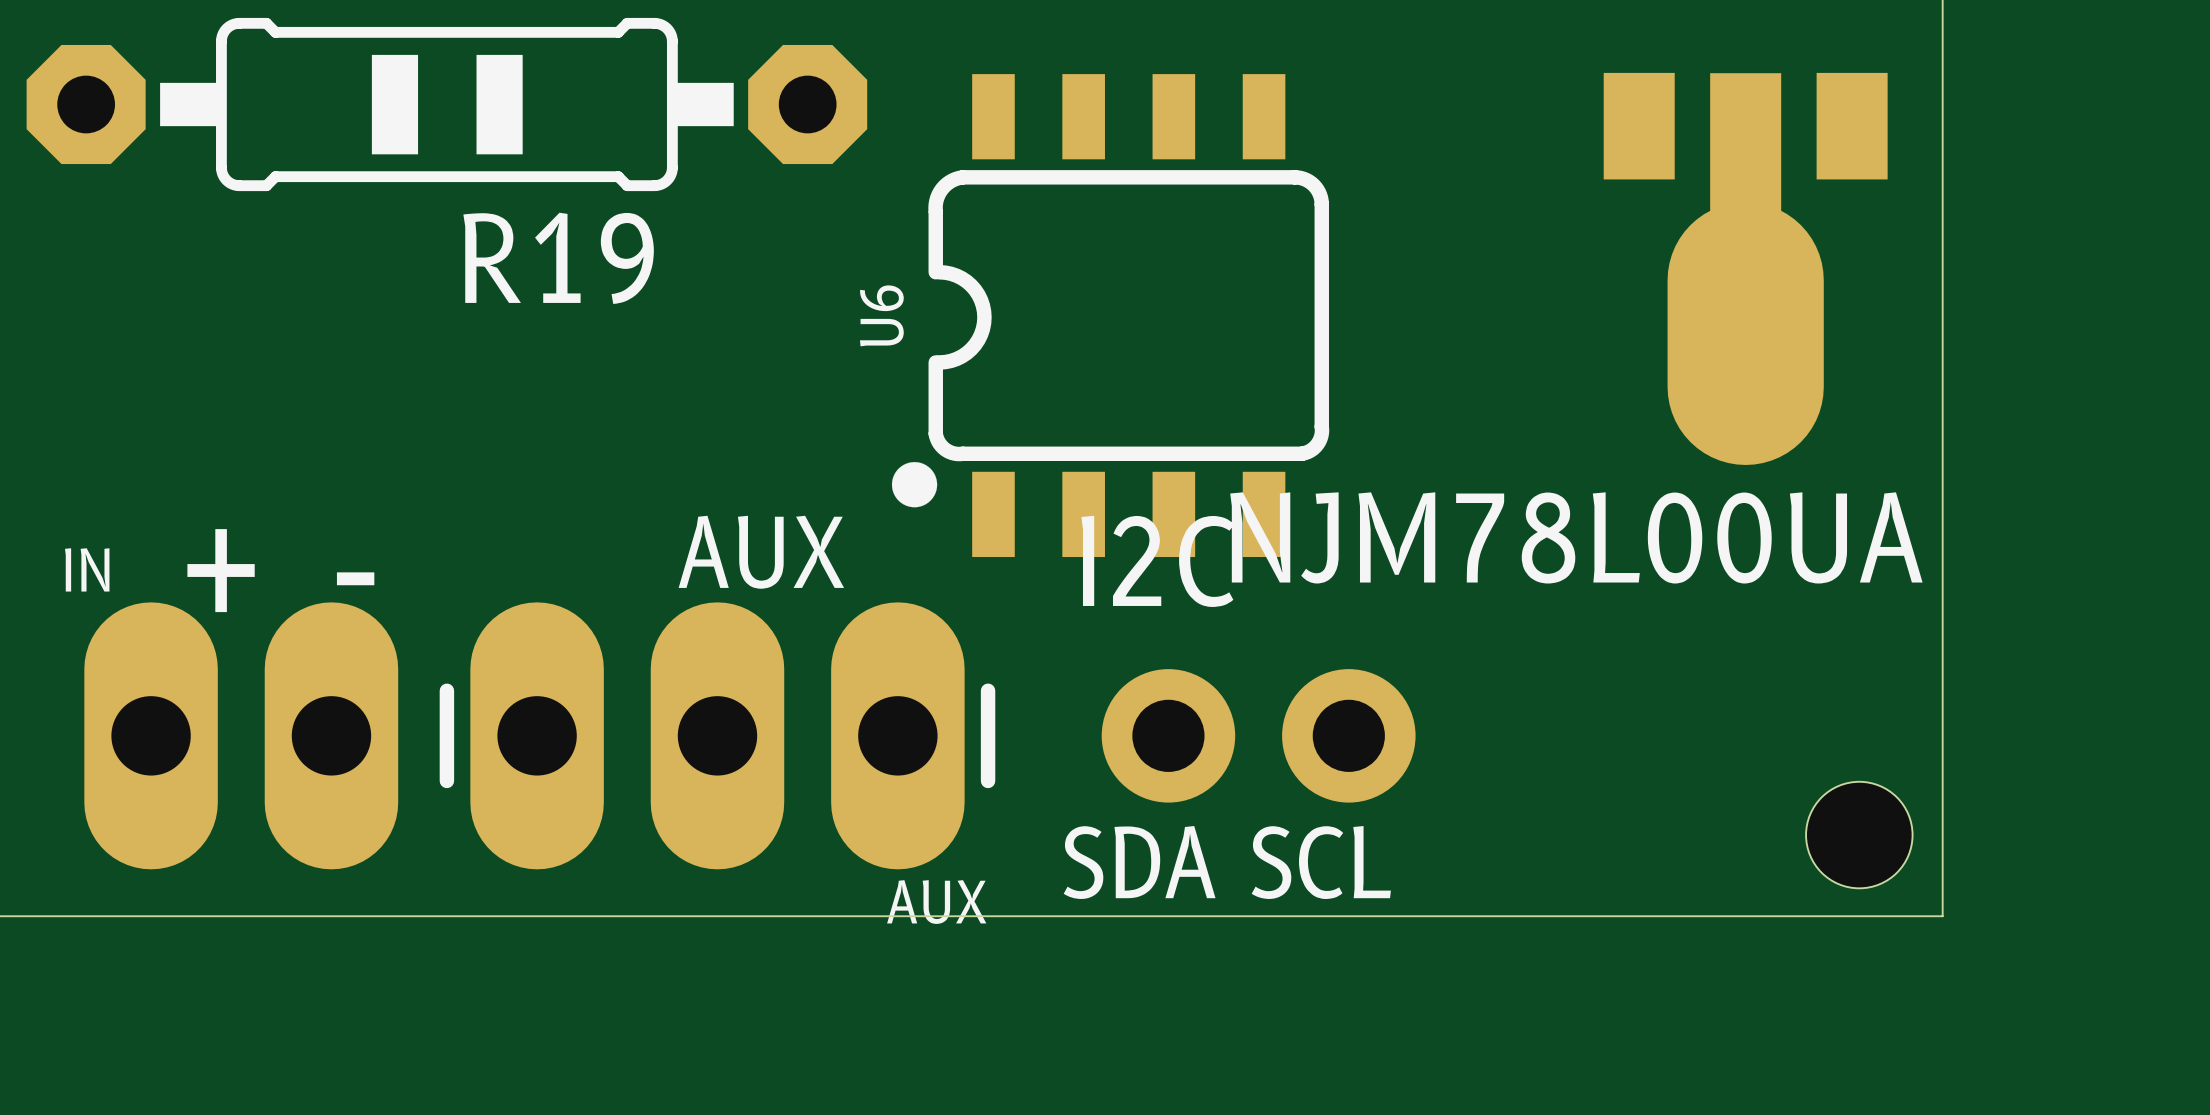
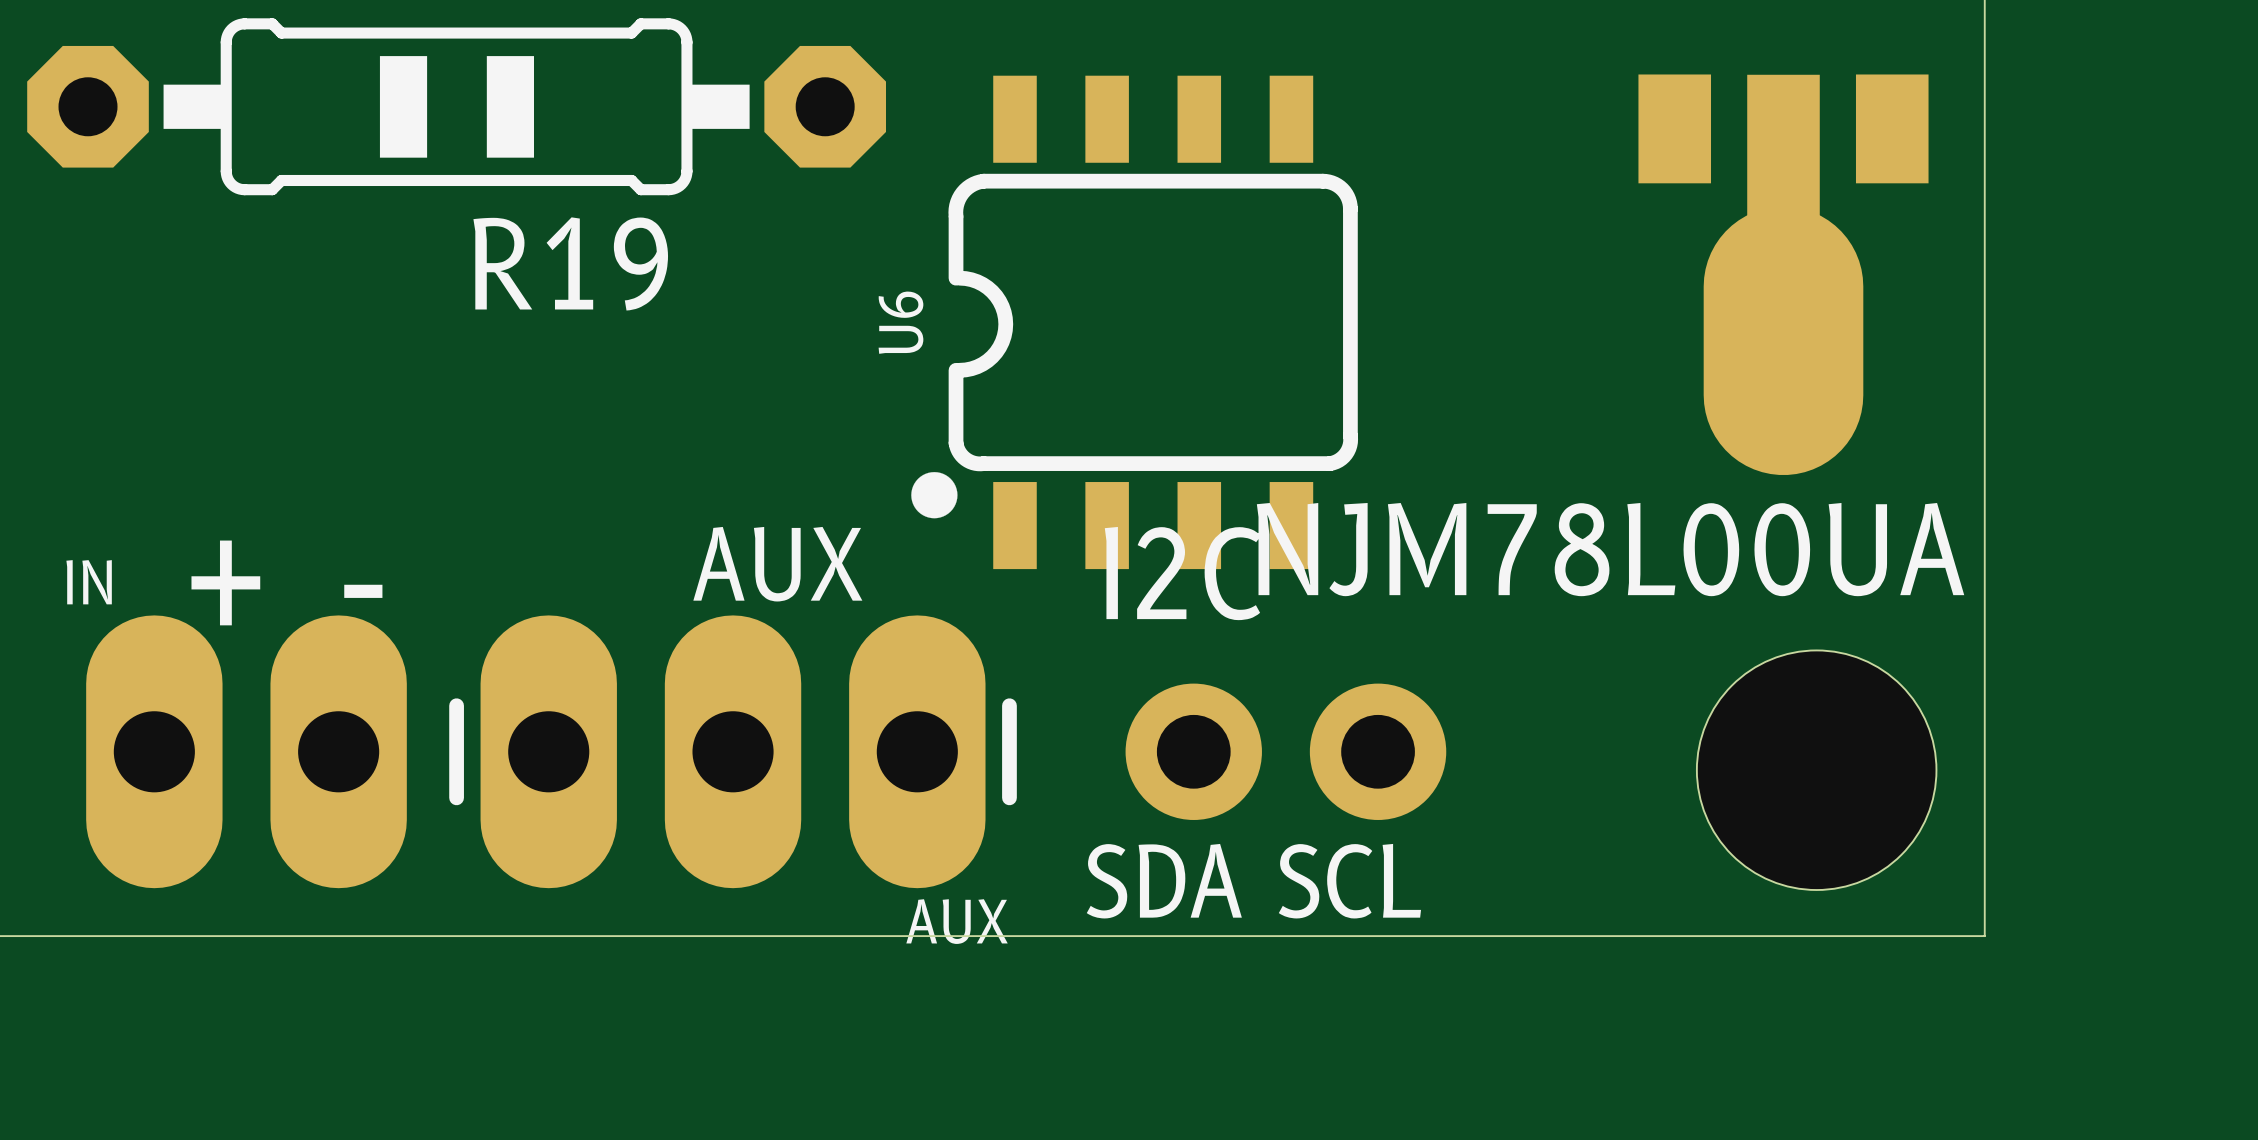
hole: none -> (1816, 770)
hole: (1859, 835) -> none

